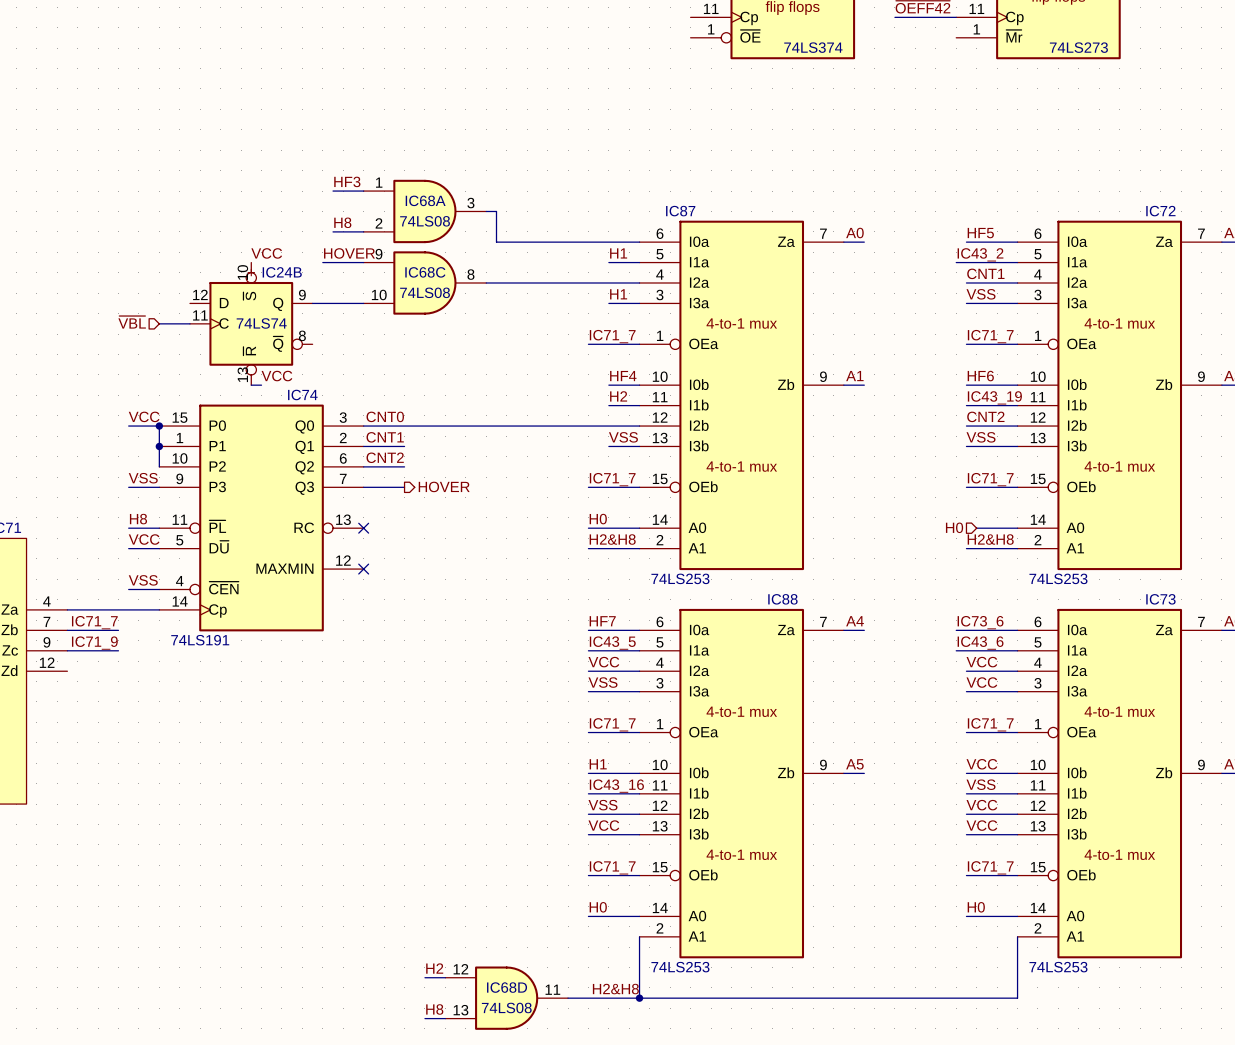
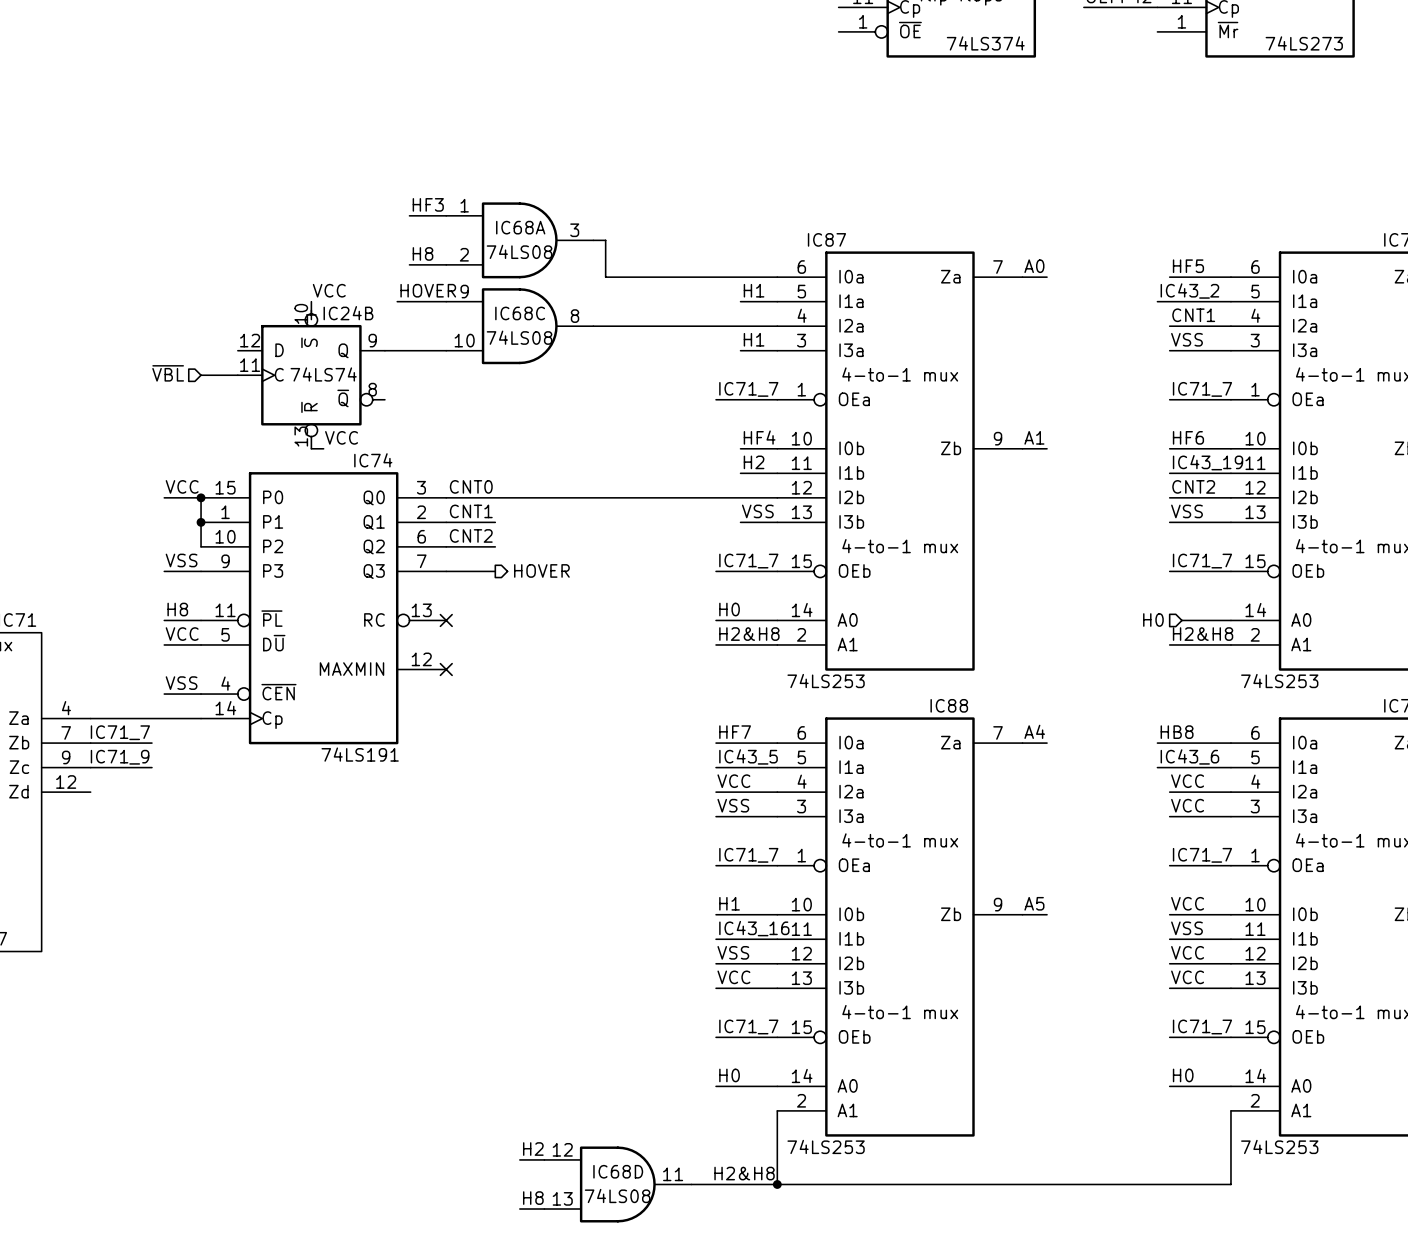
label: IC73_6 (980, 622) -> HB8 (1177, 732)
IC74 value position: 74LS191 (200, 640) -> 74LS191 (360, 754)

